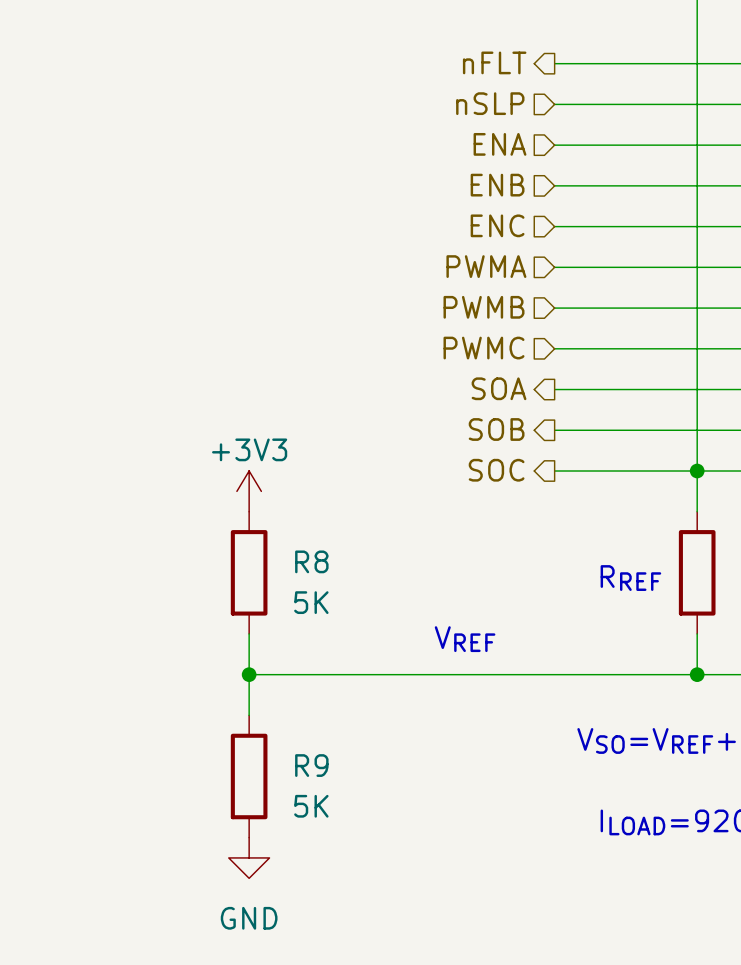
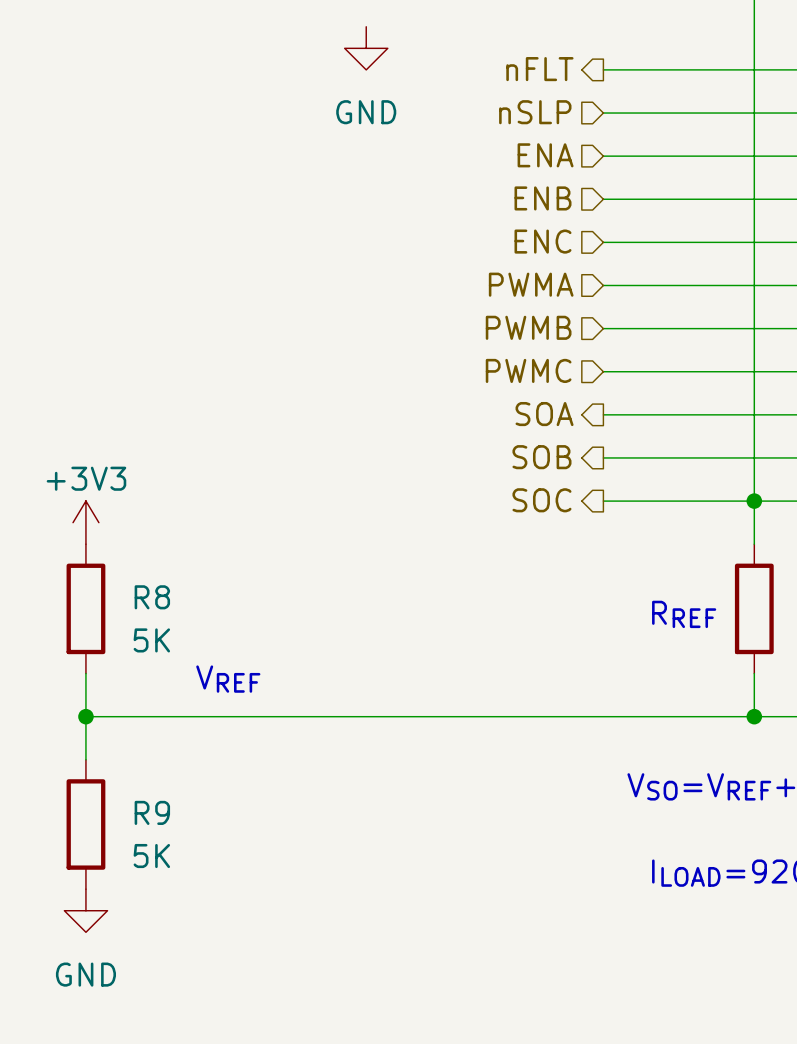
power symbol: none -> GND (366, 48)
power symbol position: +3V3 (249, 491) -> +3V3 (85, 522)
R8 position: (249, 572) -> (85, 608)
wire: (249, 633) (249, 715) -> (85, 673) (85, 759)
text position: VREF (465, 639) -> VREF (228, 679)
wire: none -> (85, 716) (279, 716)
junction: none -> (85, 716)
junction: (249, 674) -> none
R9 position: (249, 776) -> (85, 824)
power symbol position: GND (249, 857) -> GND (85, 910)

